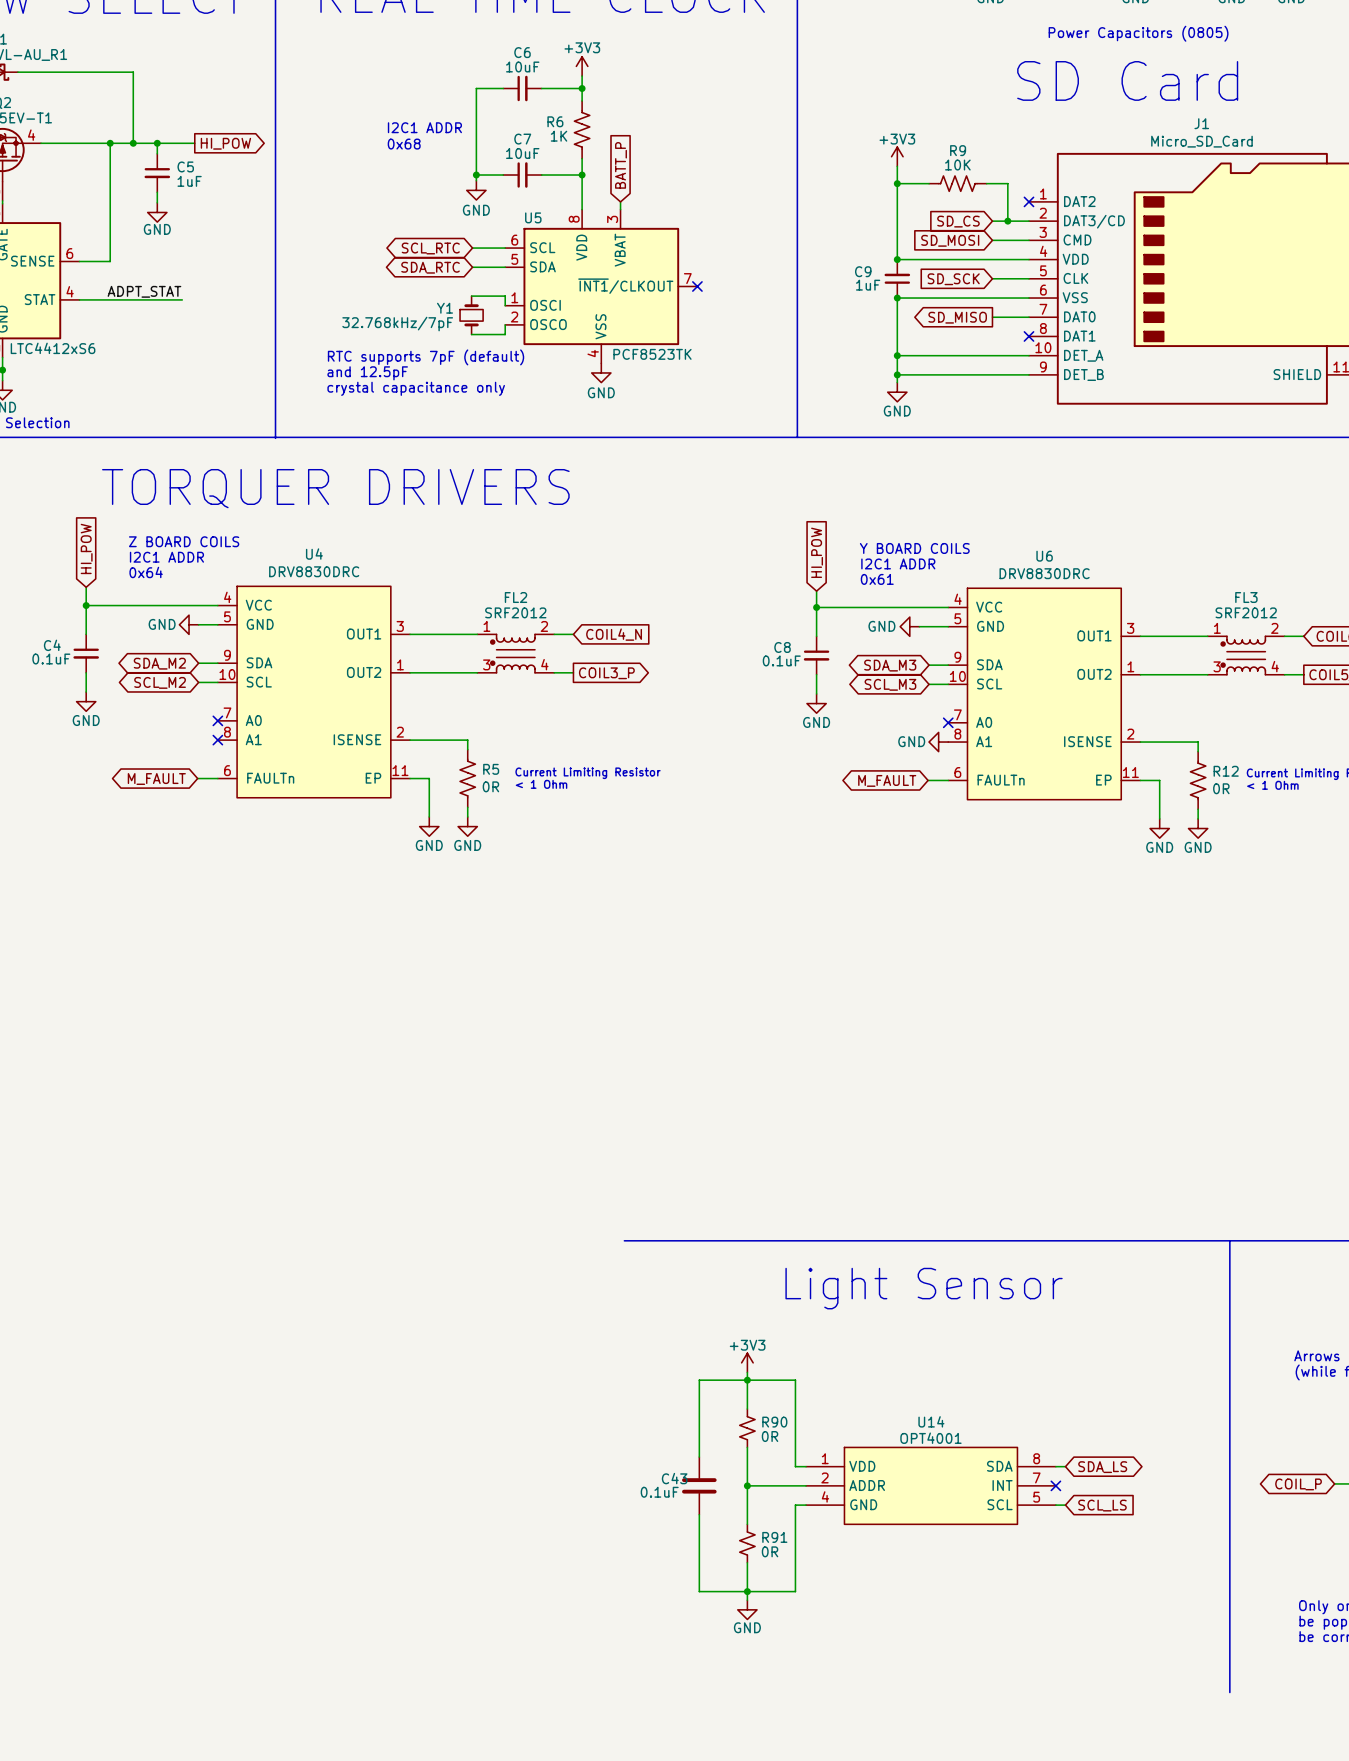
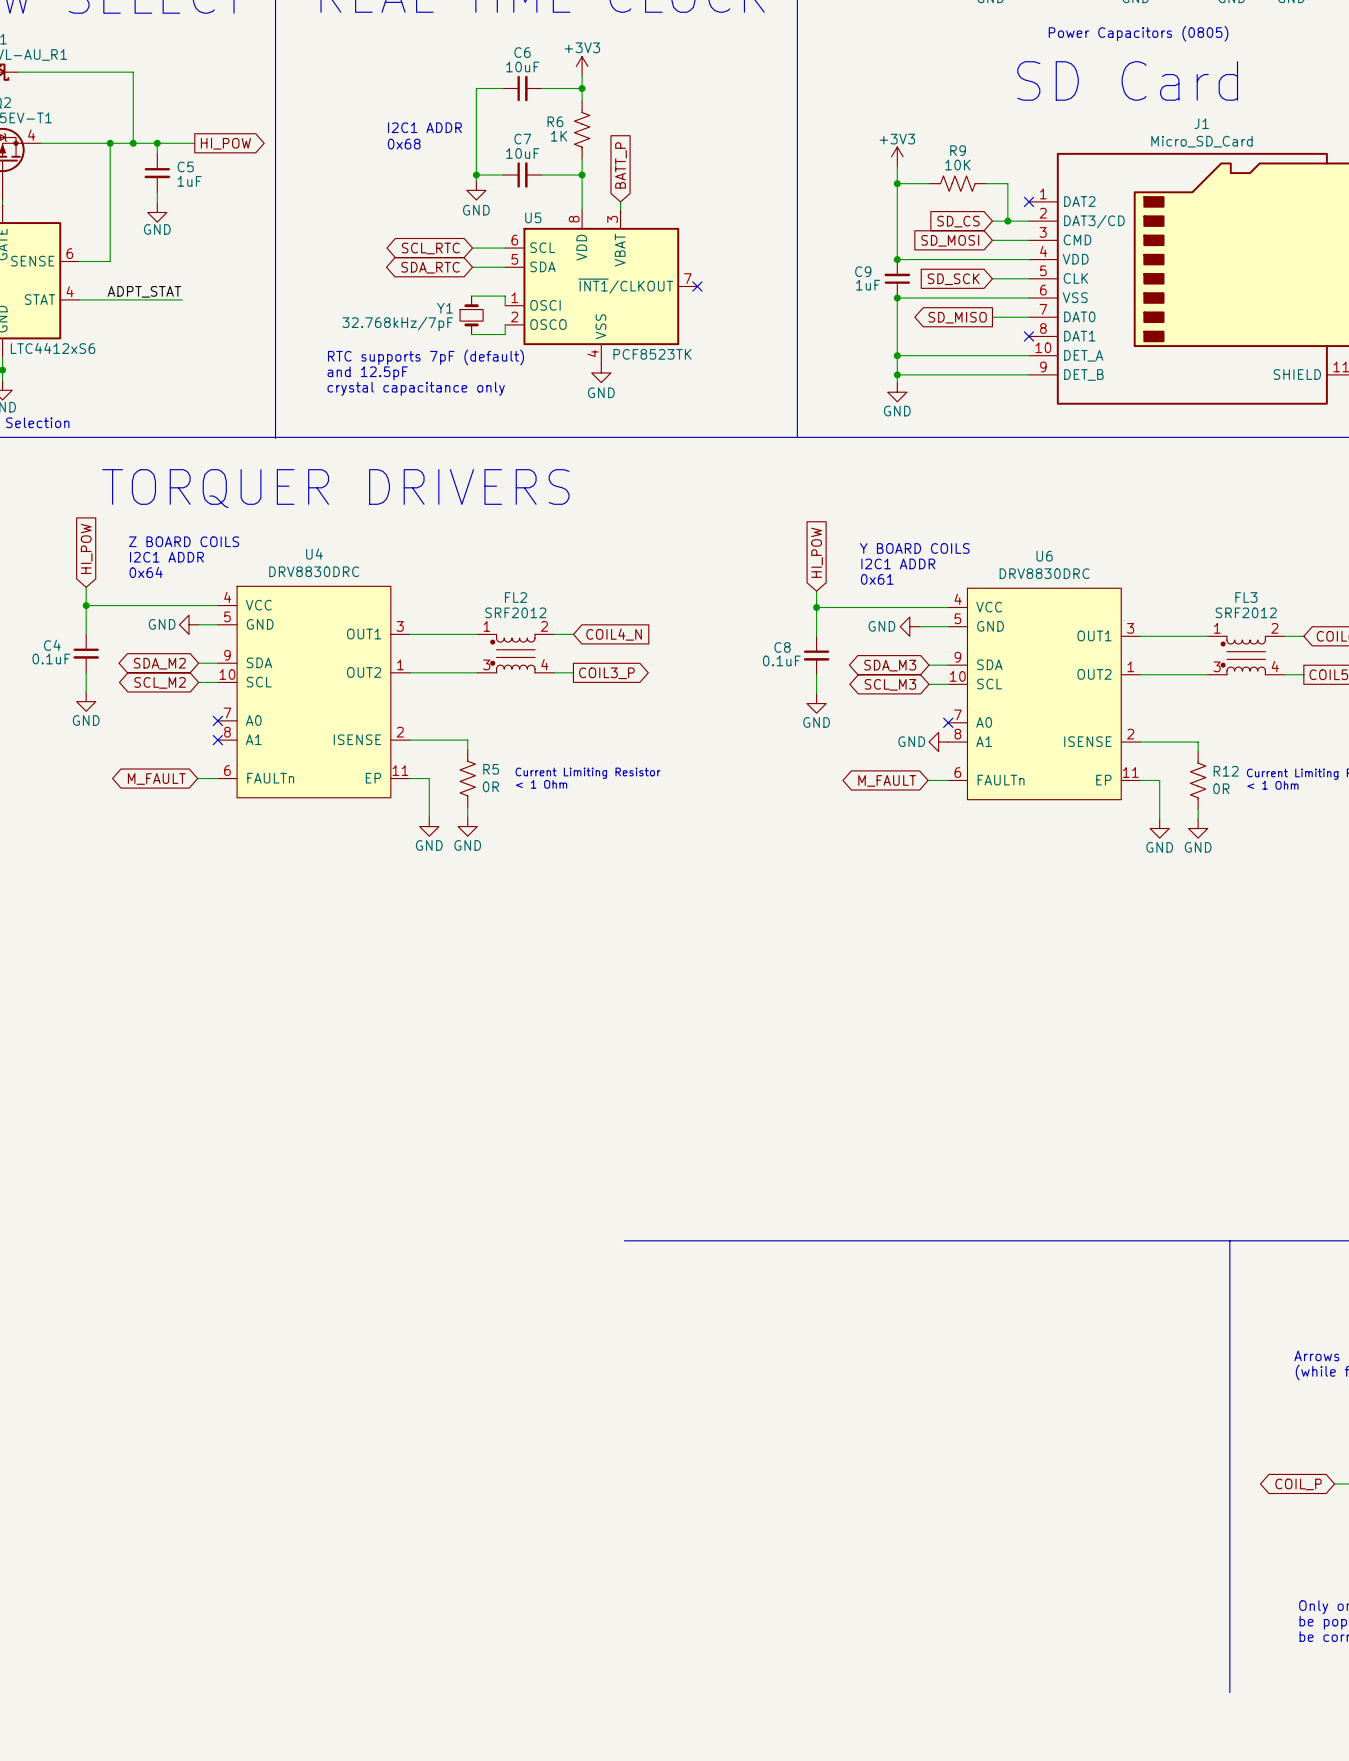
text: Light Sensor (924, 1288) -> none
power symbol: +3V3 (747, 1362) -> none
wire: (747, 1372) (747, 1409) -> none
junction: (747, 1380) -> none
R90: 0R (747, 1428) -> none
wire: (747, 1447) (747, 1524) -> none
wire: (699, 1457) (699, 1380) (795, 1380) (795, 1466) (806, 1466) -> none
wire: (1055, 1466) (1065, 1466) -> none
global label: SDA_LS (1102, 1467) -> none
C43: 0.1uF (699, 1485) -> none
wire: (747, 1485) (806, 1485) -> none
junction: (747, 1485) -> none
U14: OPT4001 (930, 1485) -> none
no-connect mark: (1055, 1485) -> none
wire: (806, 1505) (795, 1505) (795, 1591) (699, 1591) (699, 1514) -> none
wire: (1055, 1505) (1065, 1505) -> none
global label: SCL_LS (1102, 1505) -> none
R91: 0R (747, 1543) -> none
wire: (747, 1562) (747, 1600) -> none
junction: (747, 1591) -> none
power symbol: GND (747, 1609) -> none

